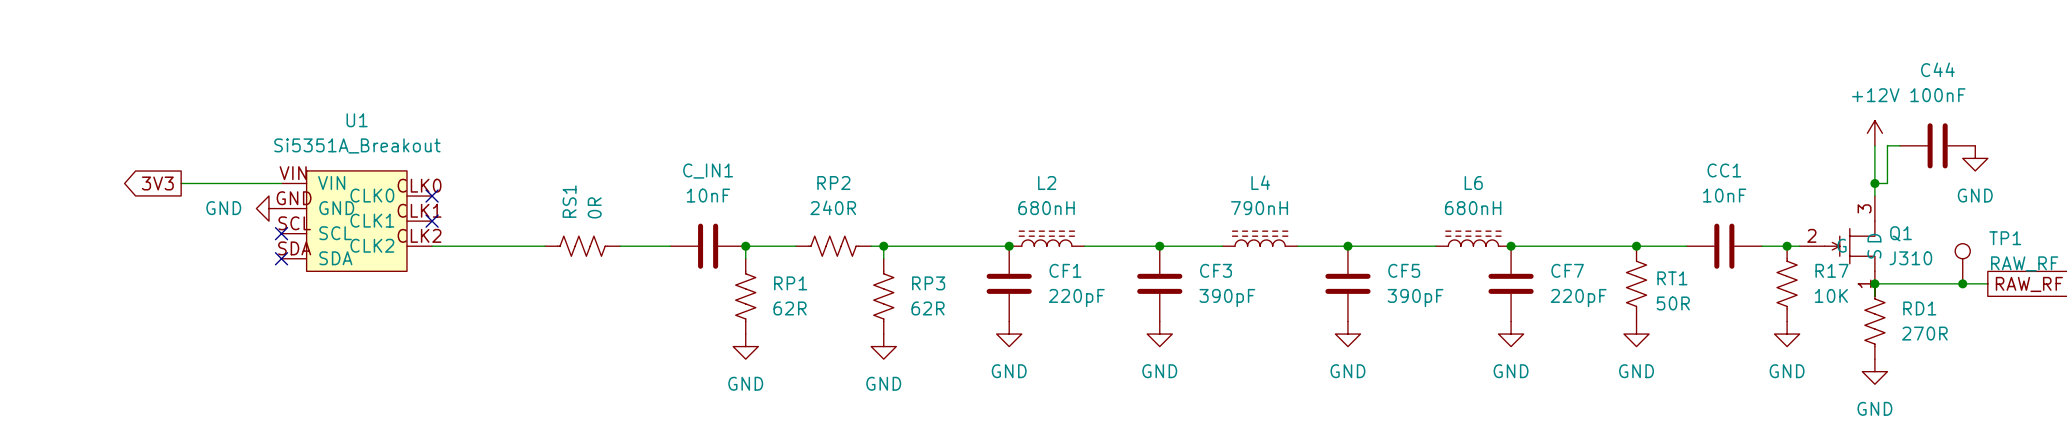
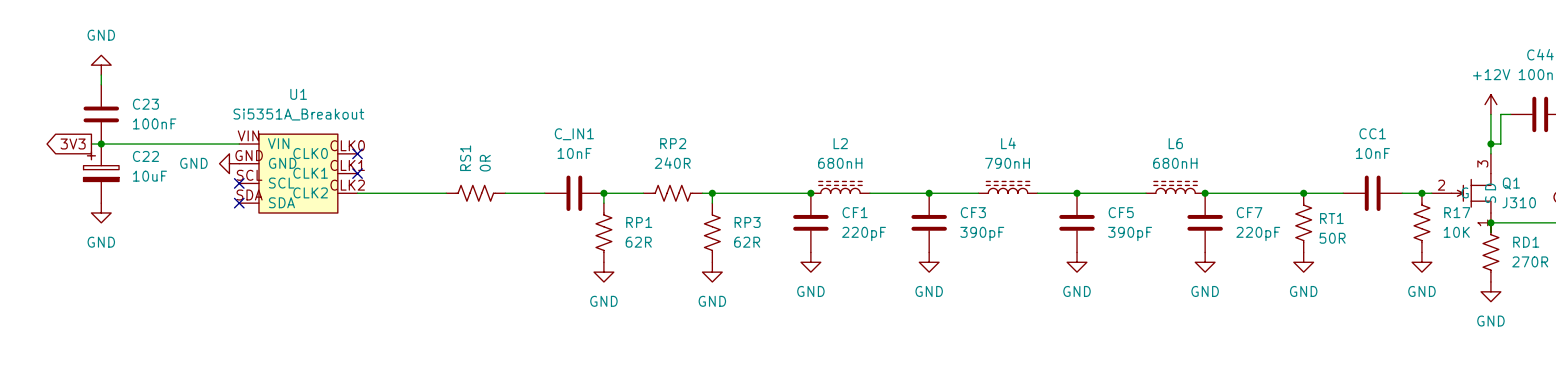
power symbol: none -> GND (101, 65)
wire: none -> (101, 75) (101, 84)
C23: none -> 100nF (101, 114)
wire: none -> (91, 144) (160, 144)
junction: none -> (101, 144)
global label position: 3V3 (157, 183) -> 3V3 (73, 144)
C22: none -> 10uF (101, 173)
power symbol: none -> GND (101, 212)

